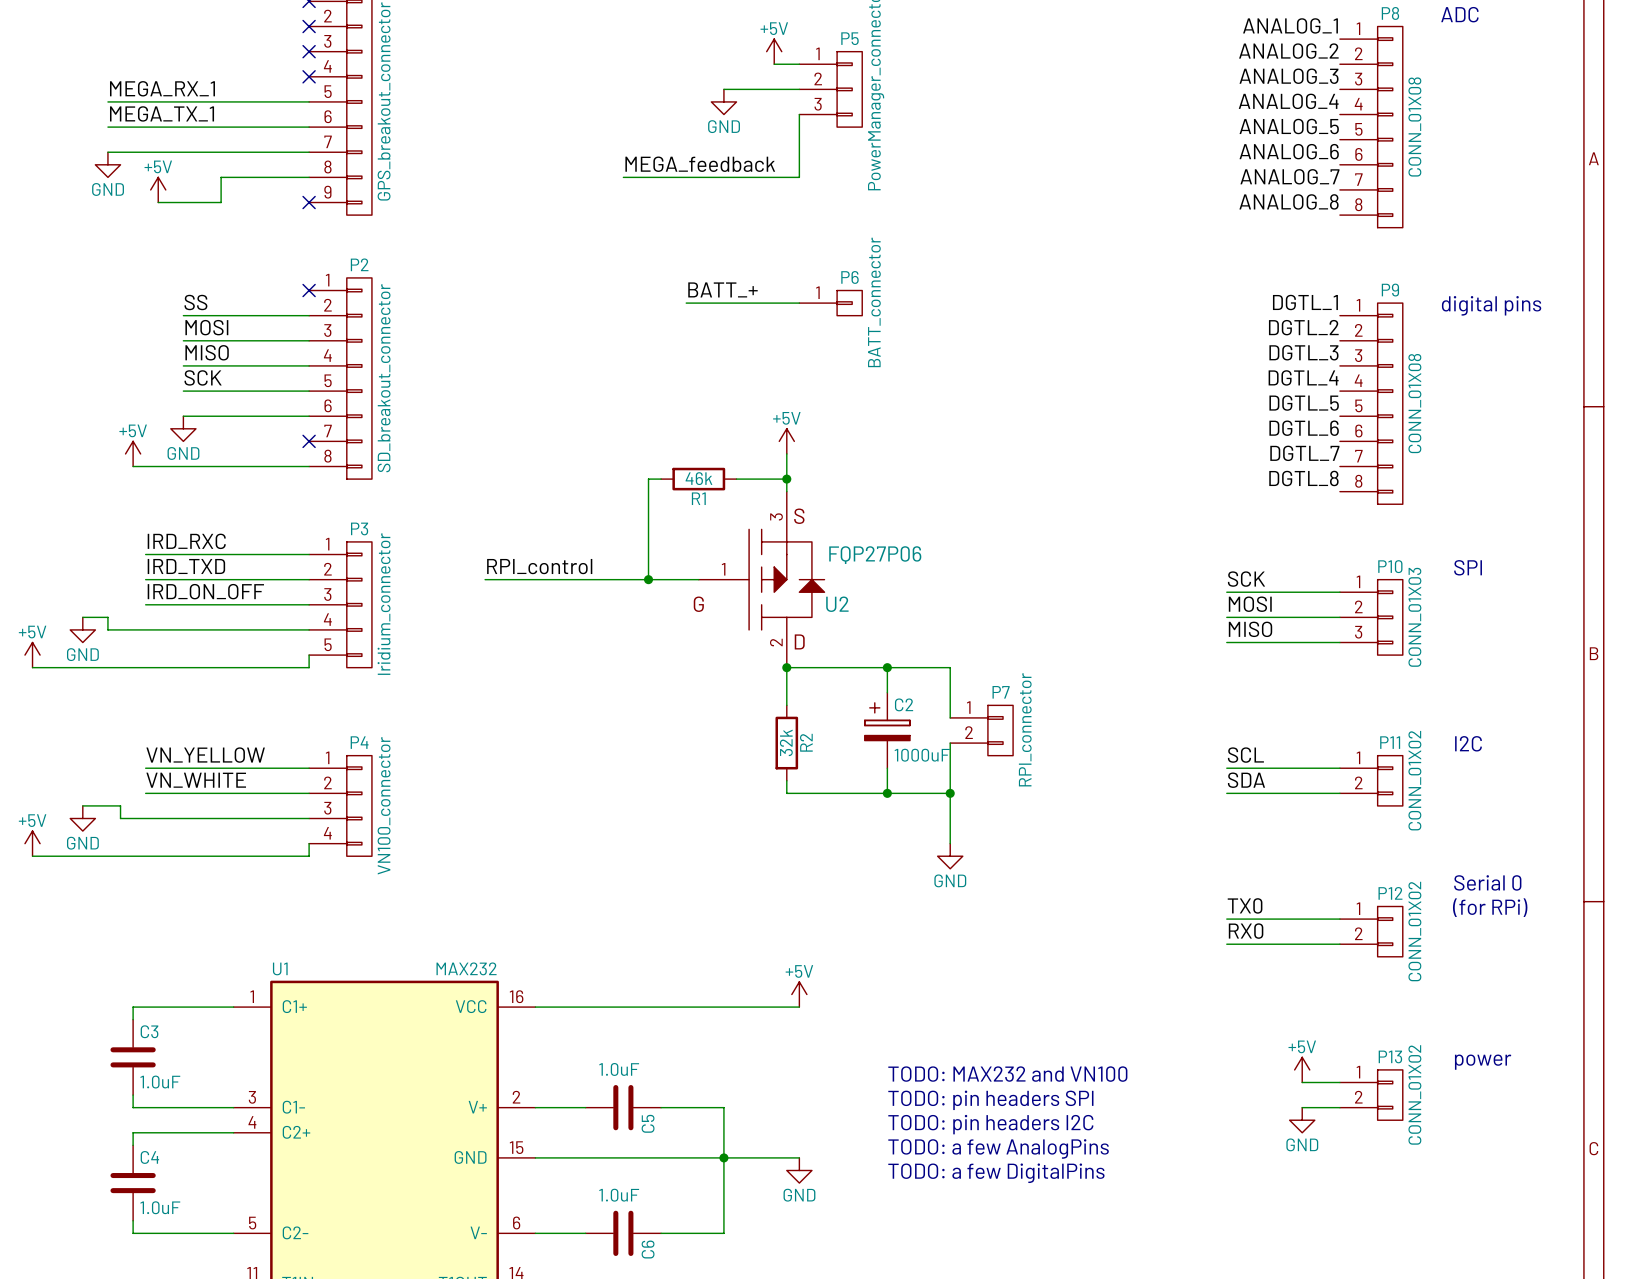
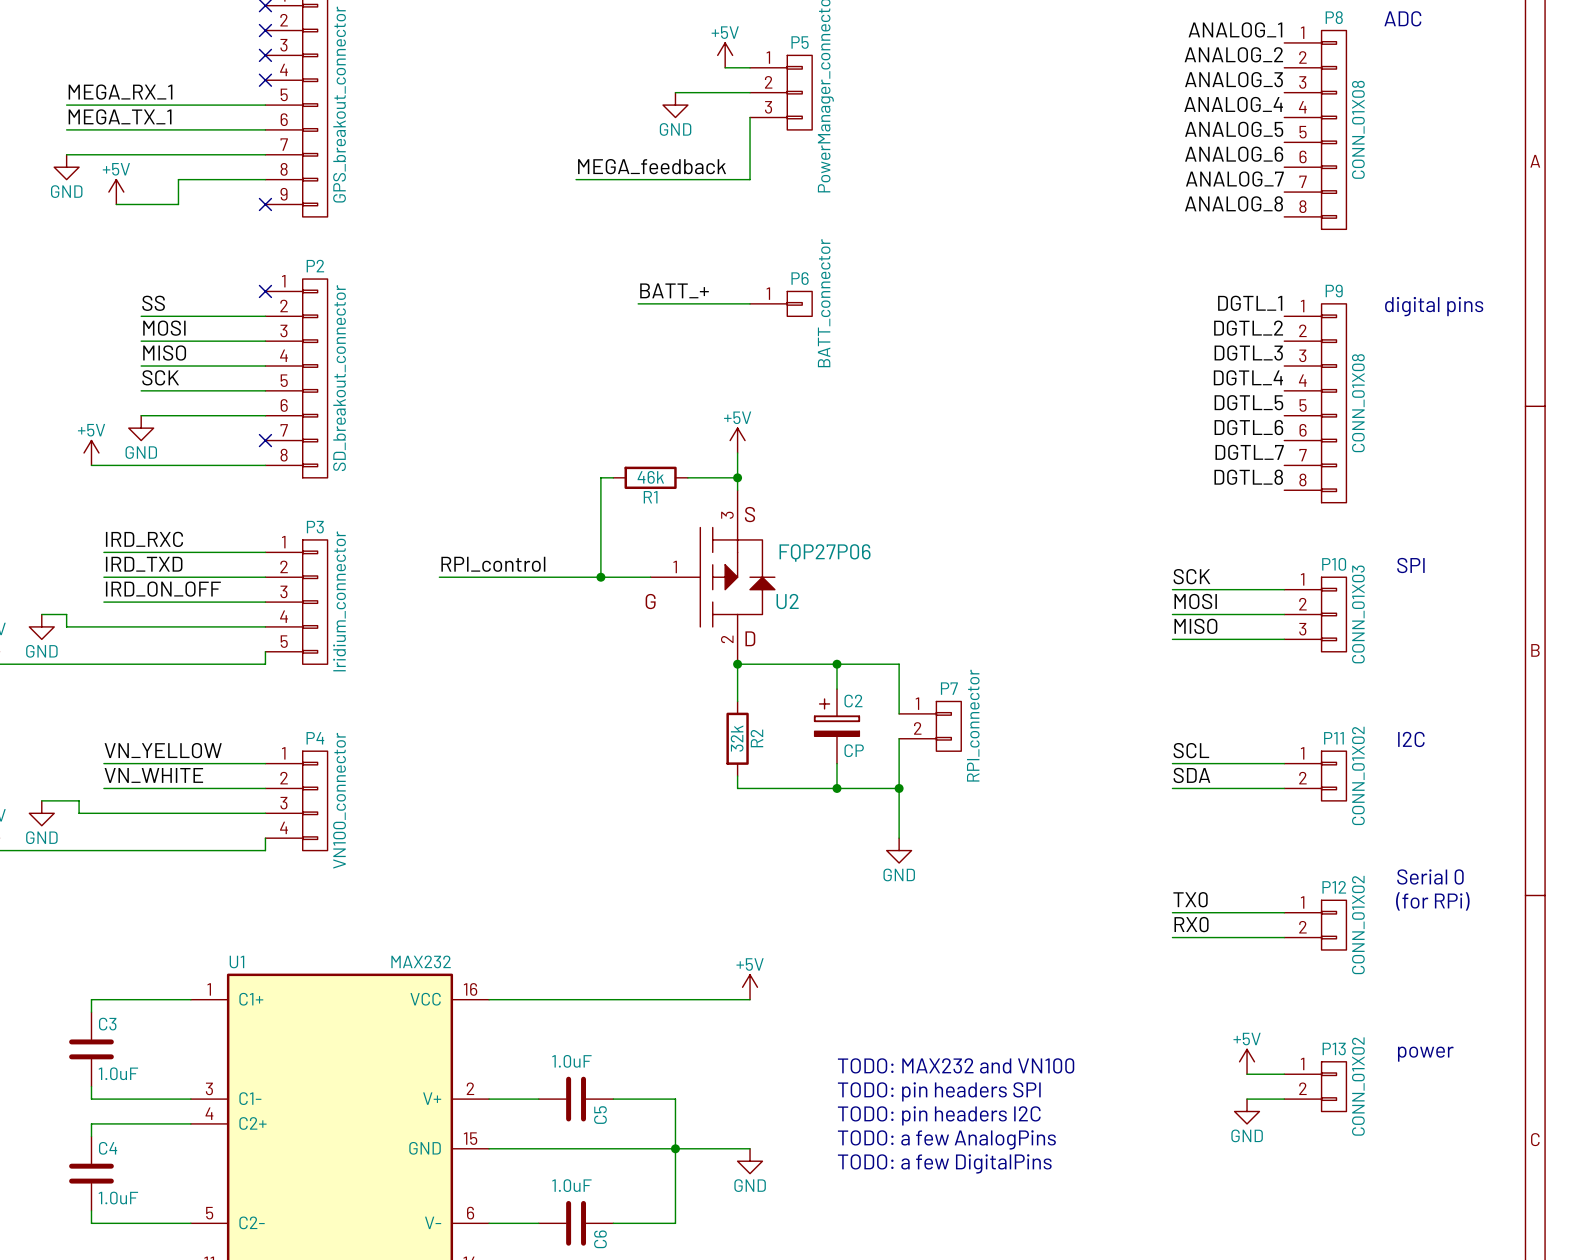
C2 value: 1000uF (922, 755) -> CP (854, 750)

